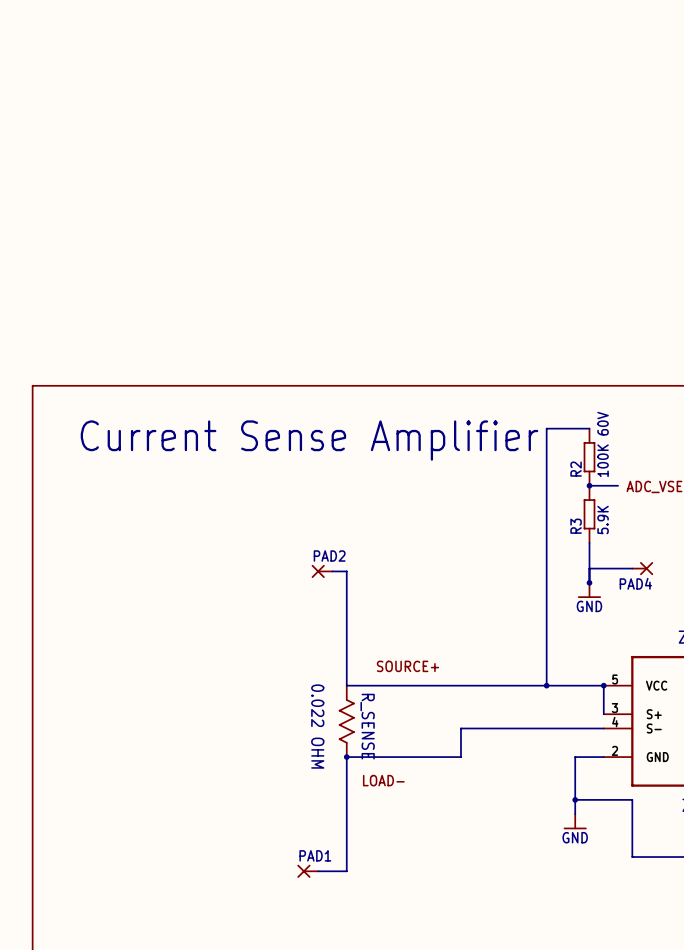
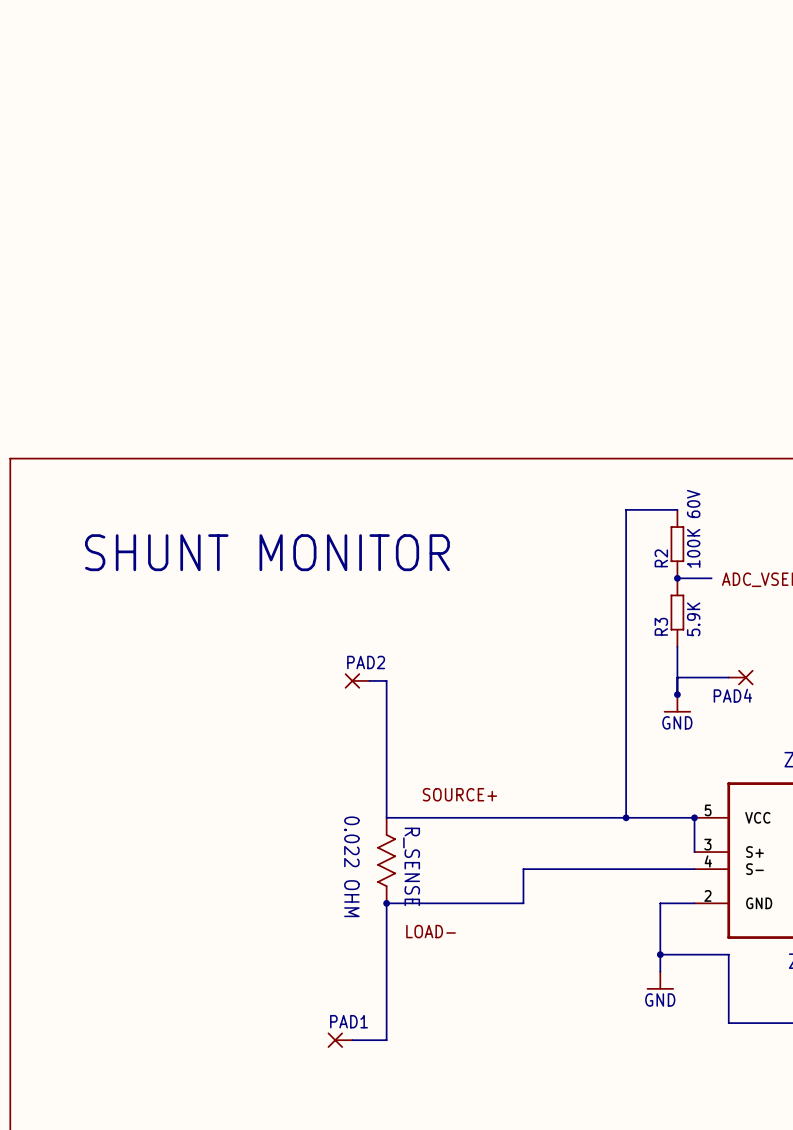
text: Current Sense Amplifier (309, 440) -> none
text: none -> SHUNT MONITOR (267, 552)

